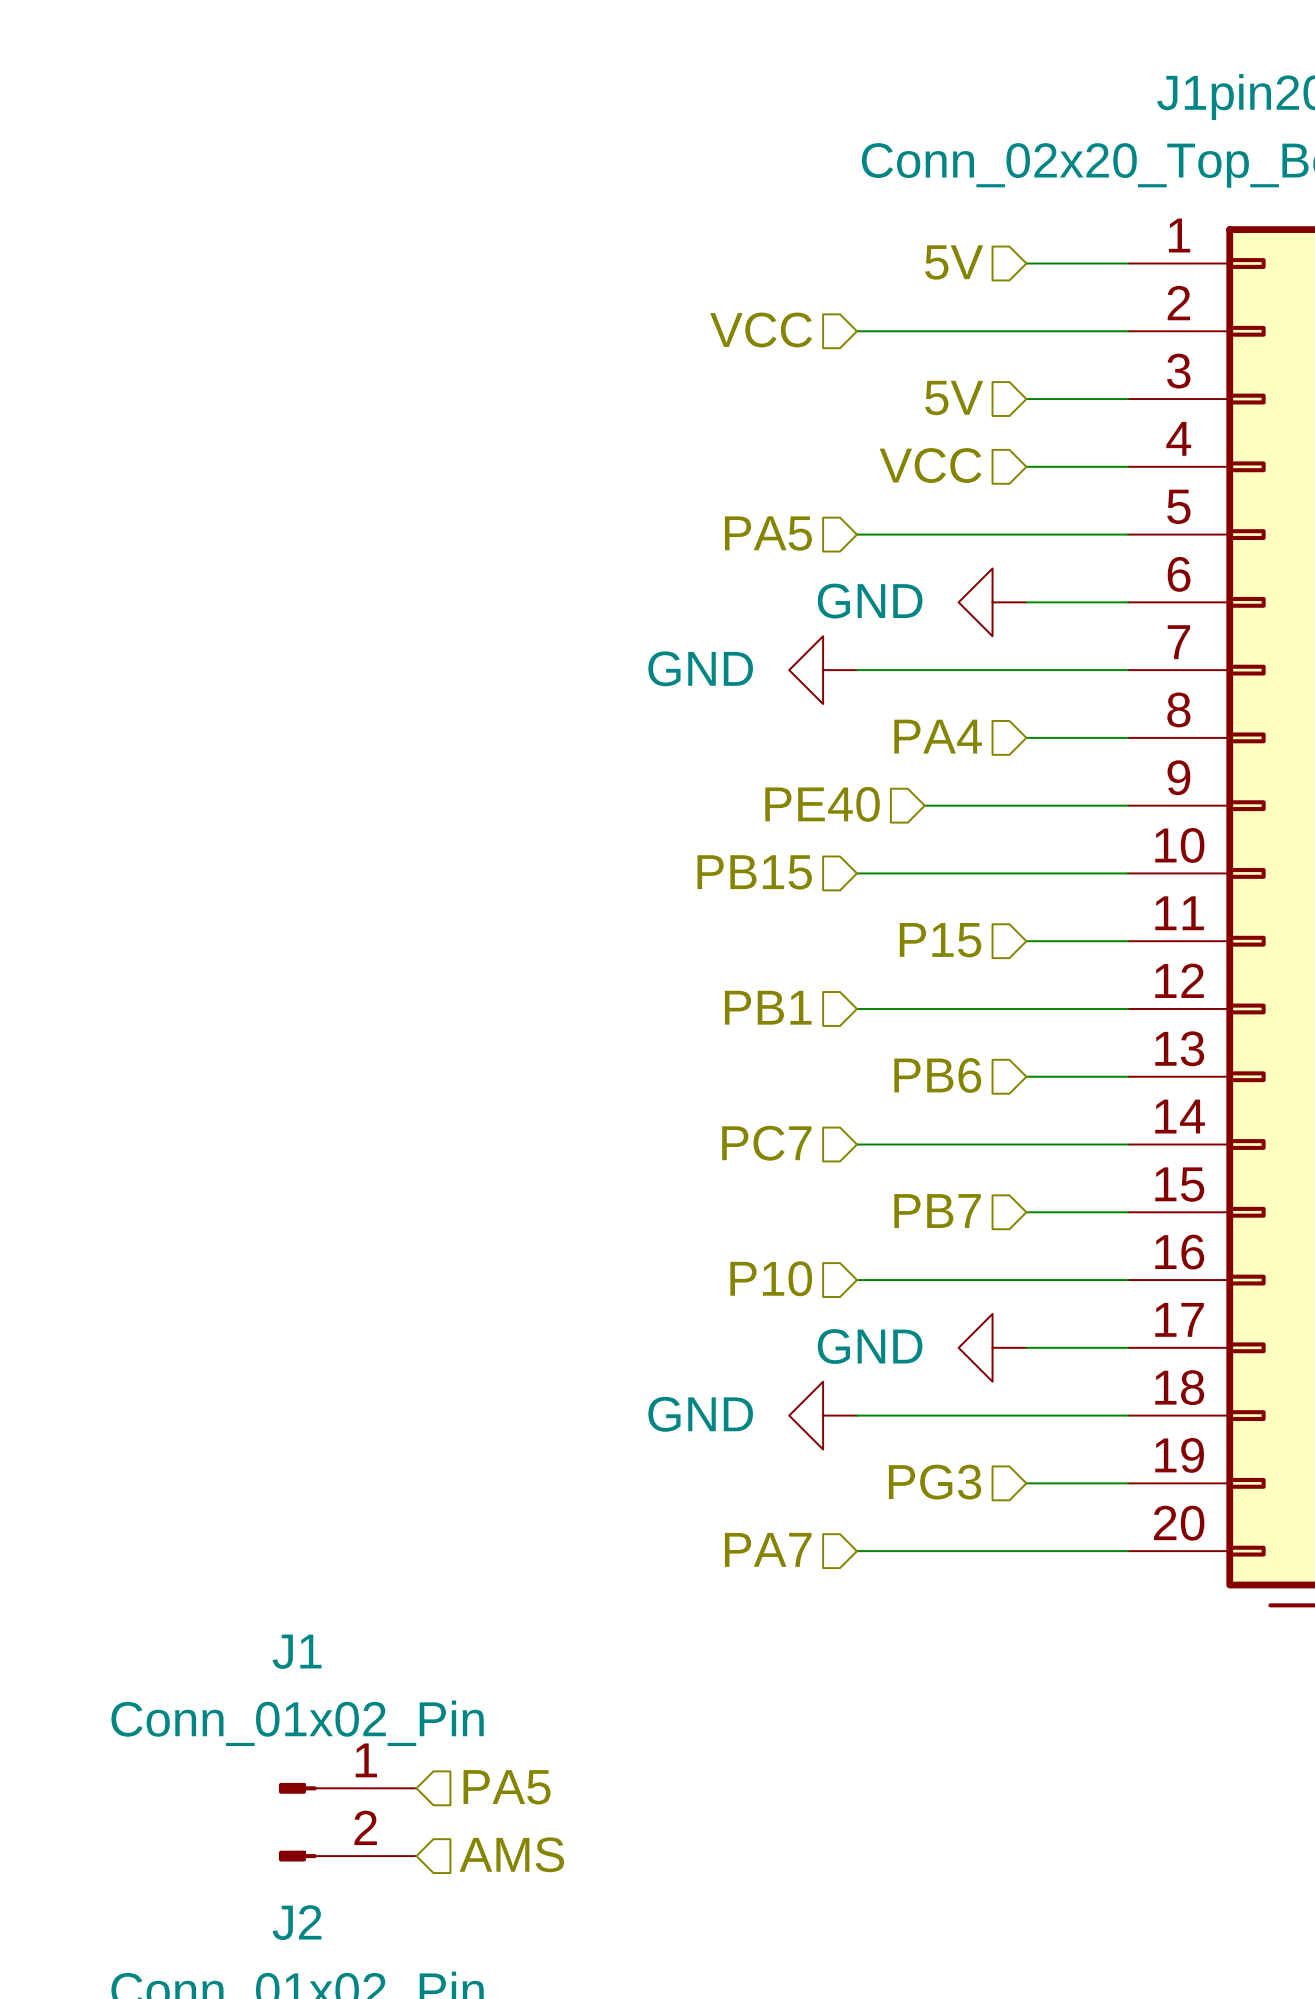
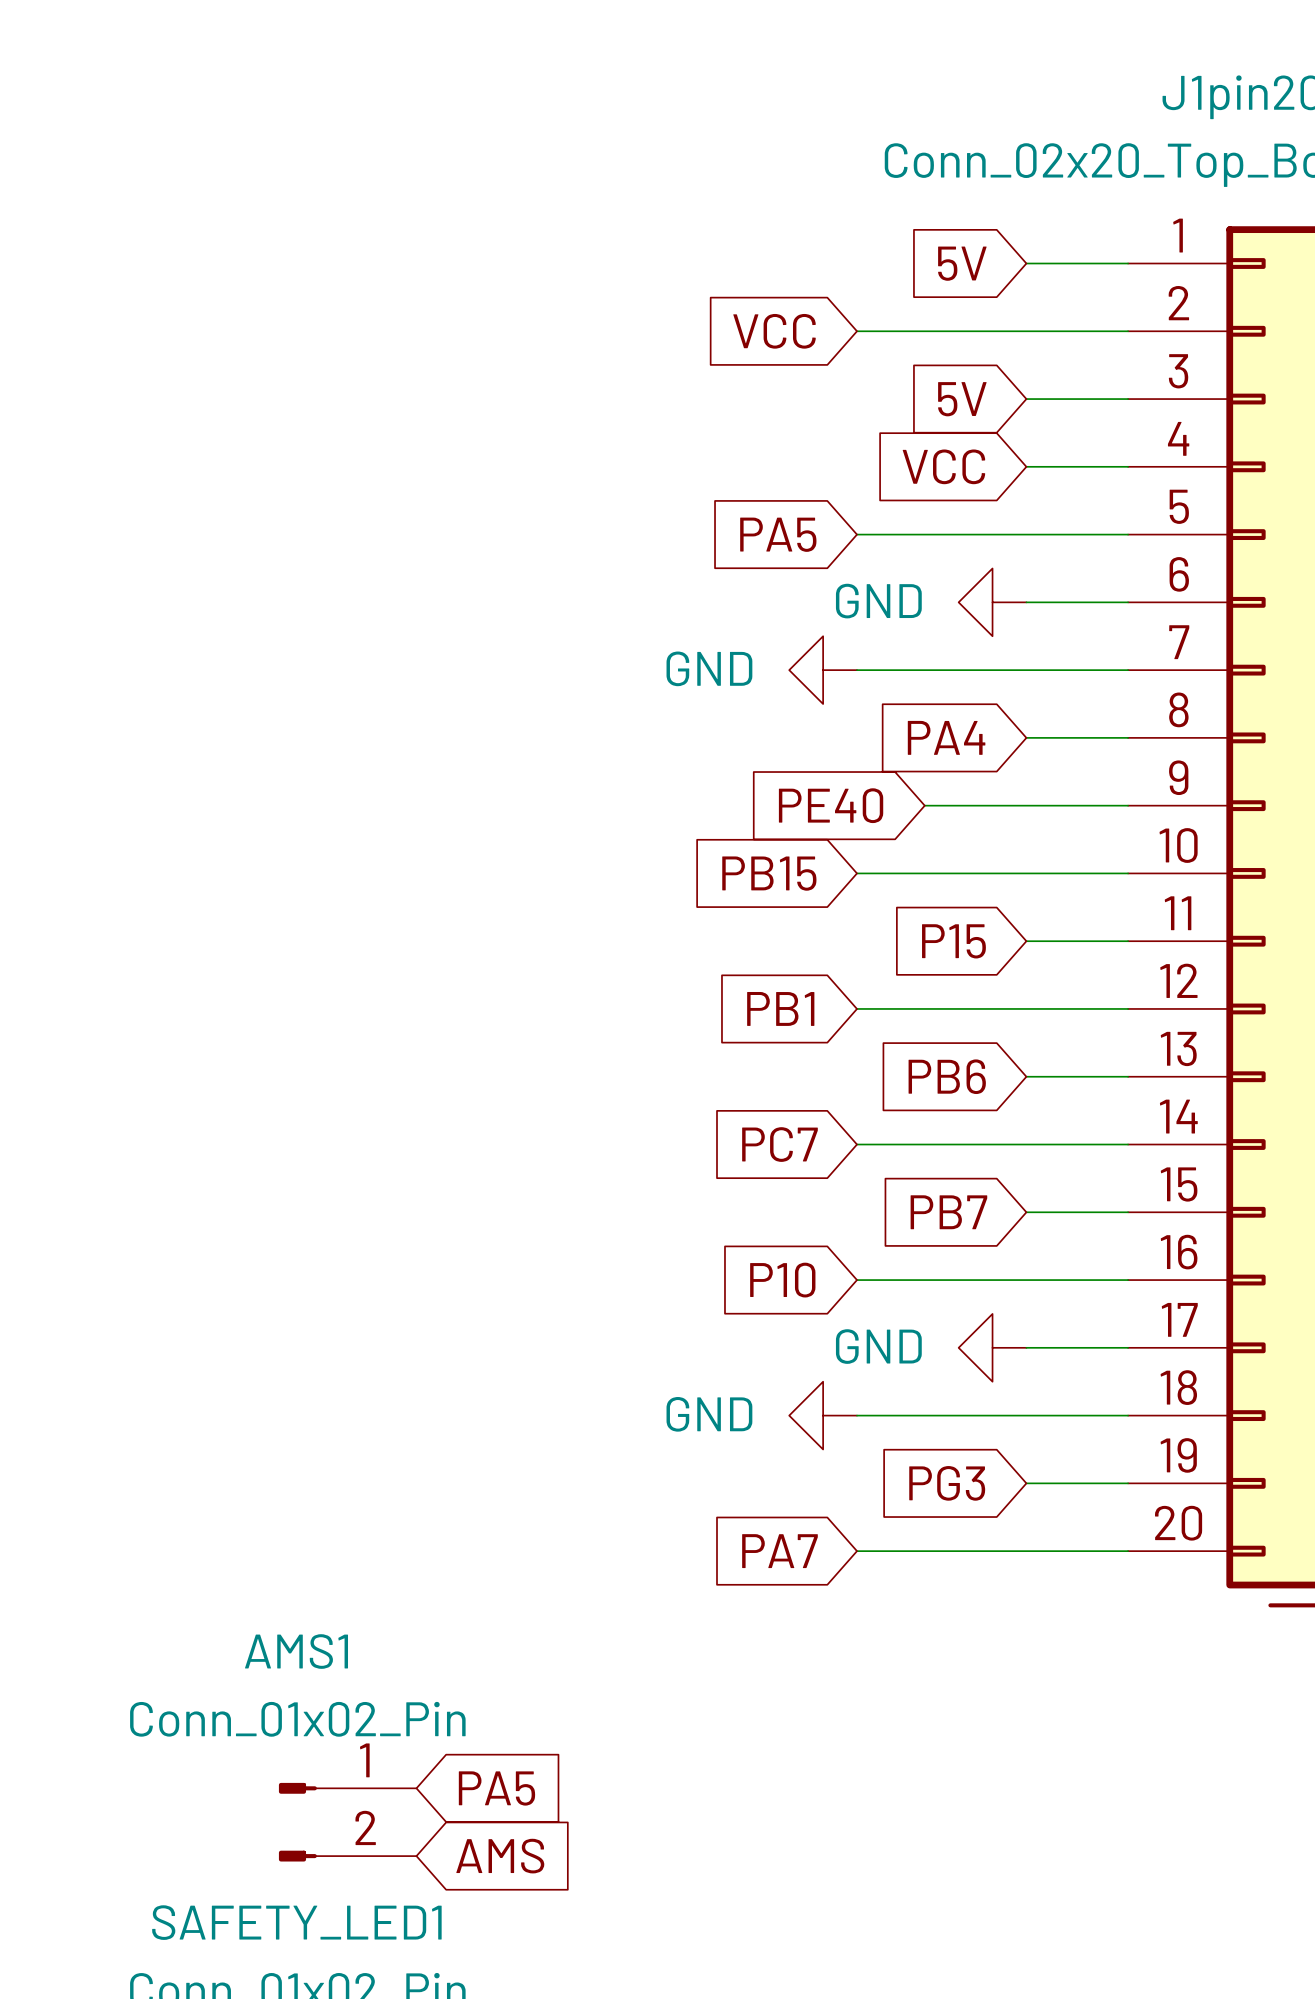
hierarchical label: 5V (954, 262) -> none
global label: none -> 5V (962, 263)
hierarchical label: VCC (761, 329) -> none
global label: none -> VCC (774, 331)
hierarchical label: 5V (954, 398) -> none
global label: none -> 5V (962, 399)
hierarchical label: VCC (930, 465) -> none
global label: none -> VCC (943, 466)
hierarchical label: PA5 (768, 533) -> none
global label: none -> PA5 (778, 534)
hierarchical label: PA4 (938, 736) -> none
global label: none -> PA4 (946, 737)
hierarchical label: PE40 (822, 804) -> none
global label: none -> PE40 (831, 805)
hierarchical label: PB15 (754, 872) -> none
global label: none -> PB15 (769, 873)
hierarchical label: P15 (940, 940) -> none
global label: none -> P15 (953, 941)
hierarchical label: PB1 (768, 1007) -> none
global label: none -> PB1 (780, 1008)
hierarchical label: PB6 (937, 1075) -> none
global label: none -> PB6 (947, 1076)
hierarchical label: PC7 (766, 1143) -> none
global label: none -> PC7 (779, 1144)
hierarchical label: PB7 (937, 1211) -> none
global label: none -> PB7 (948, 1212)
hierarchical label: P10 (771, 1278) -> none
global label: none -> P10 (782, 1280)
hierarchical label: PG3 (935, 1482) -> none
global label: none -> PG3 (947, 1483)
hierarchical label: PA7 (768, 1549) -> none
global label: none -> PA7 (779, 1551)
J1 name: J1 (297, 1651) -> AMS1 (296, 1651)
hierarchical label: PA5 (507, 1787) -> none
global label: none -> PA5 (496, 1788)
hierarchical label: AMS (511, 1854) -> none
global label: none -> AMS (500, 1856)
J2 name: J2 (297, 1922) -> SAFETY_LED1 (296, 1922)

